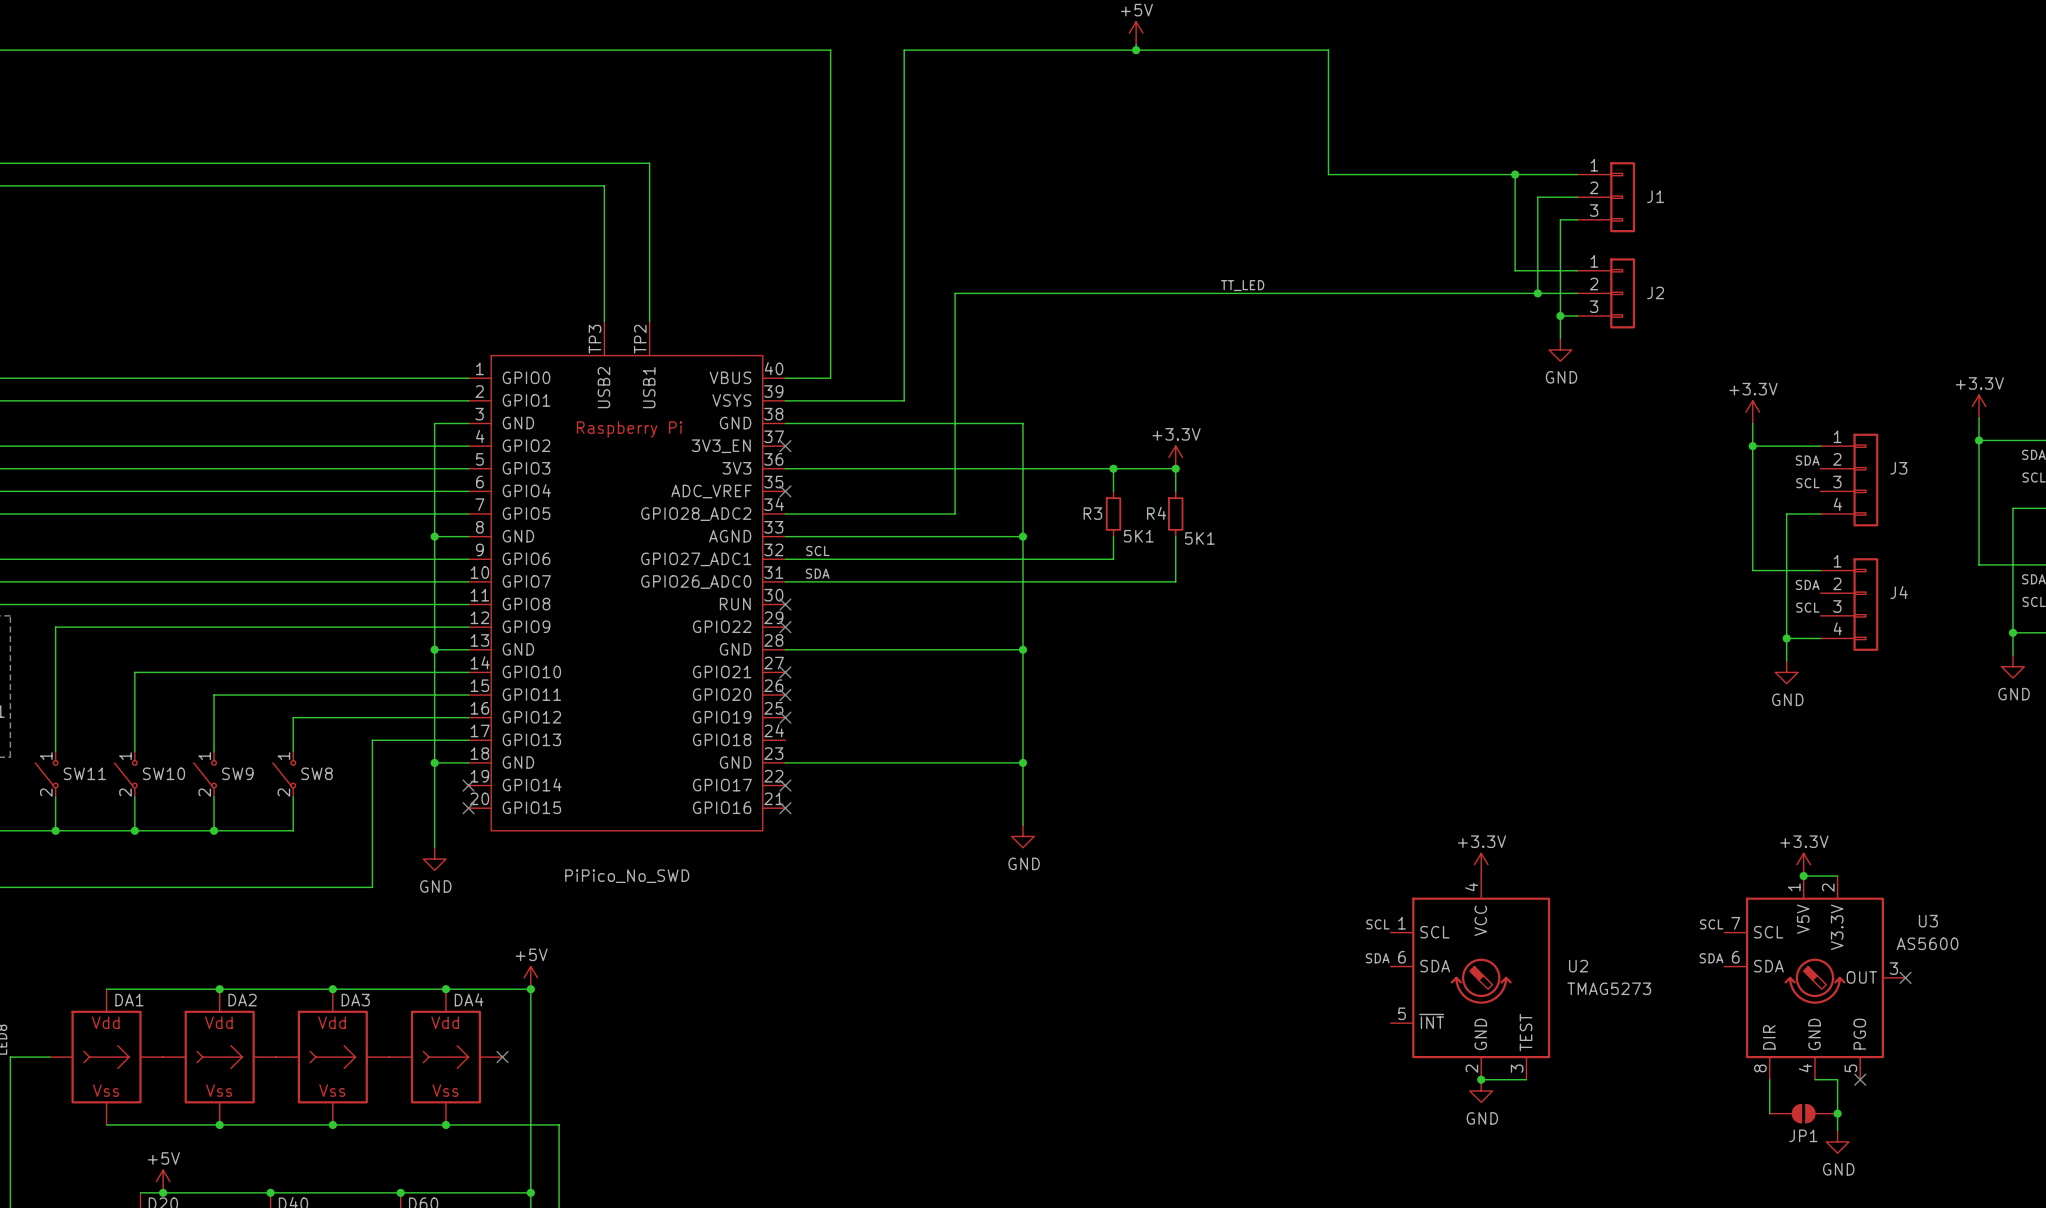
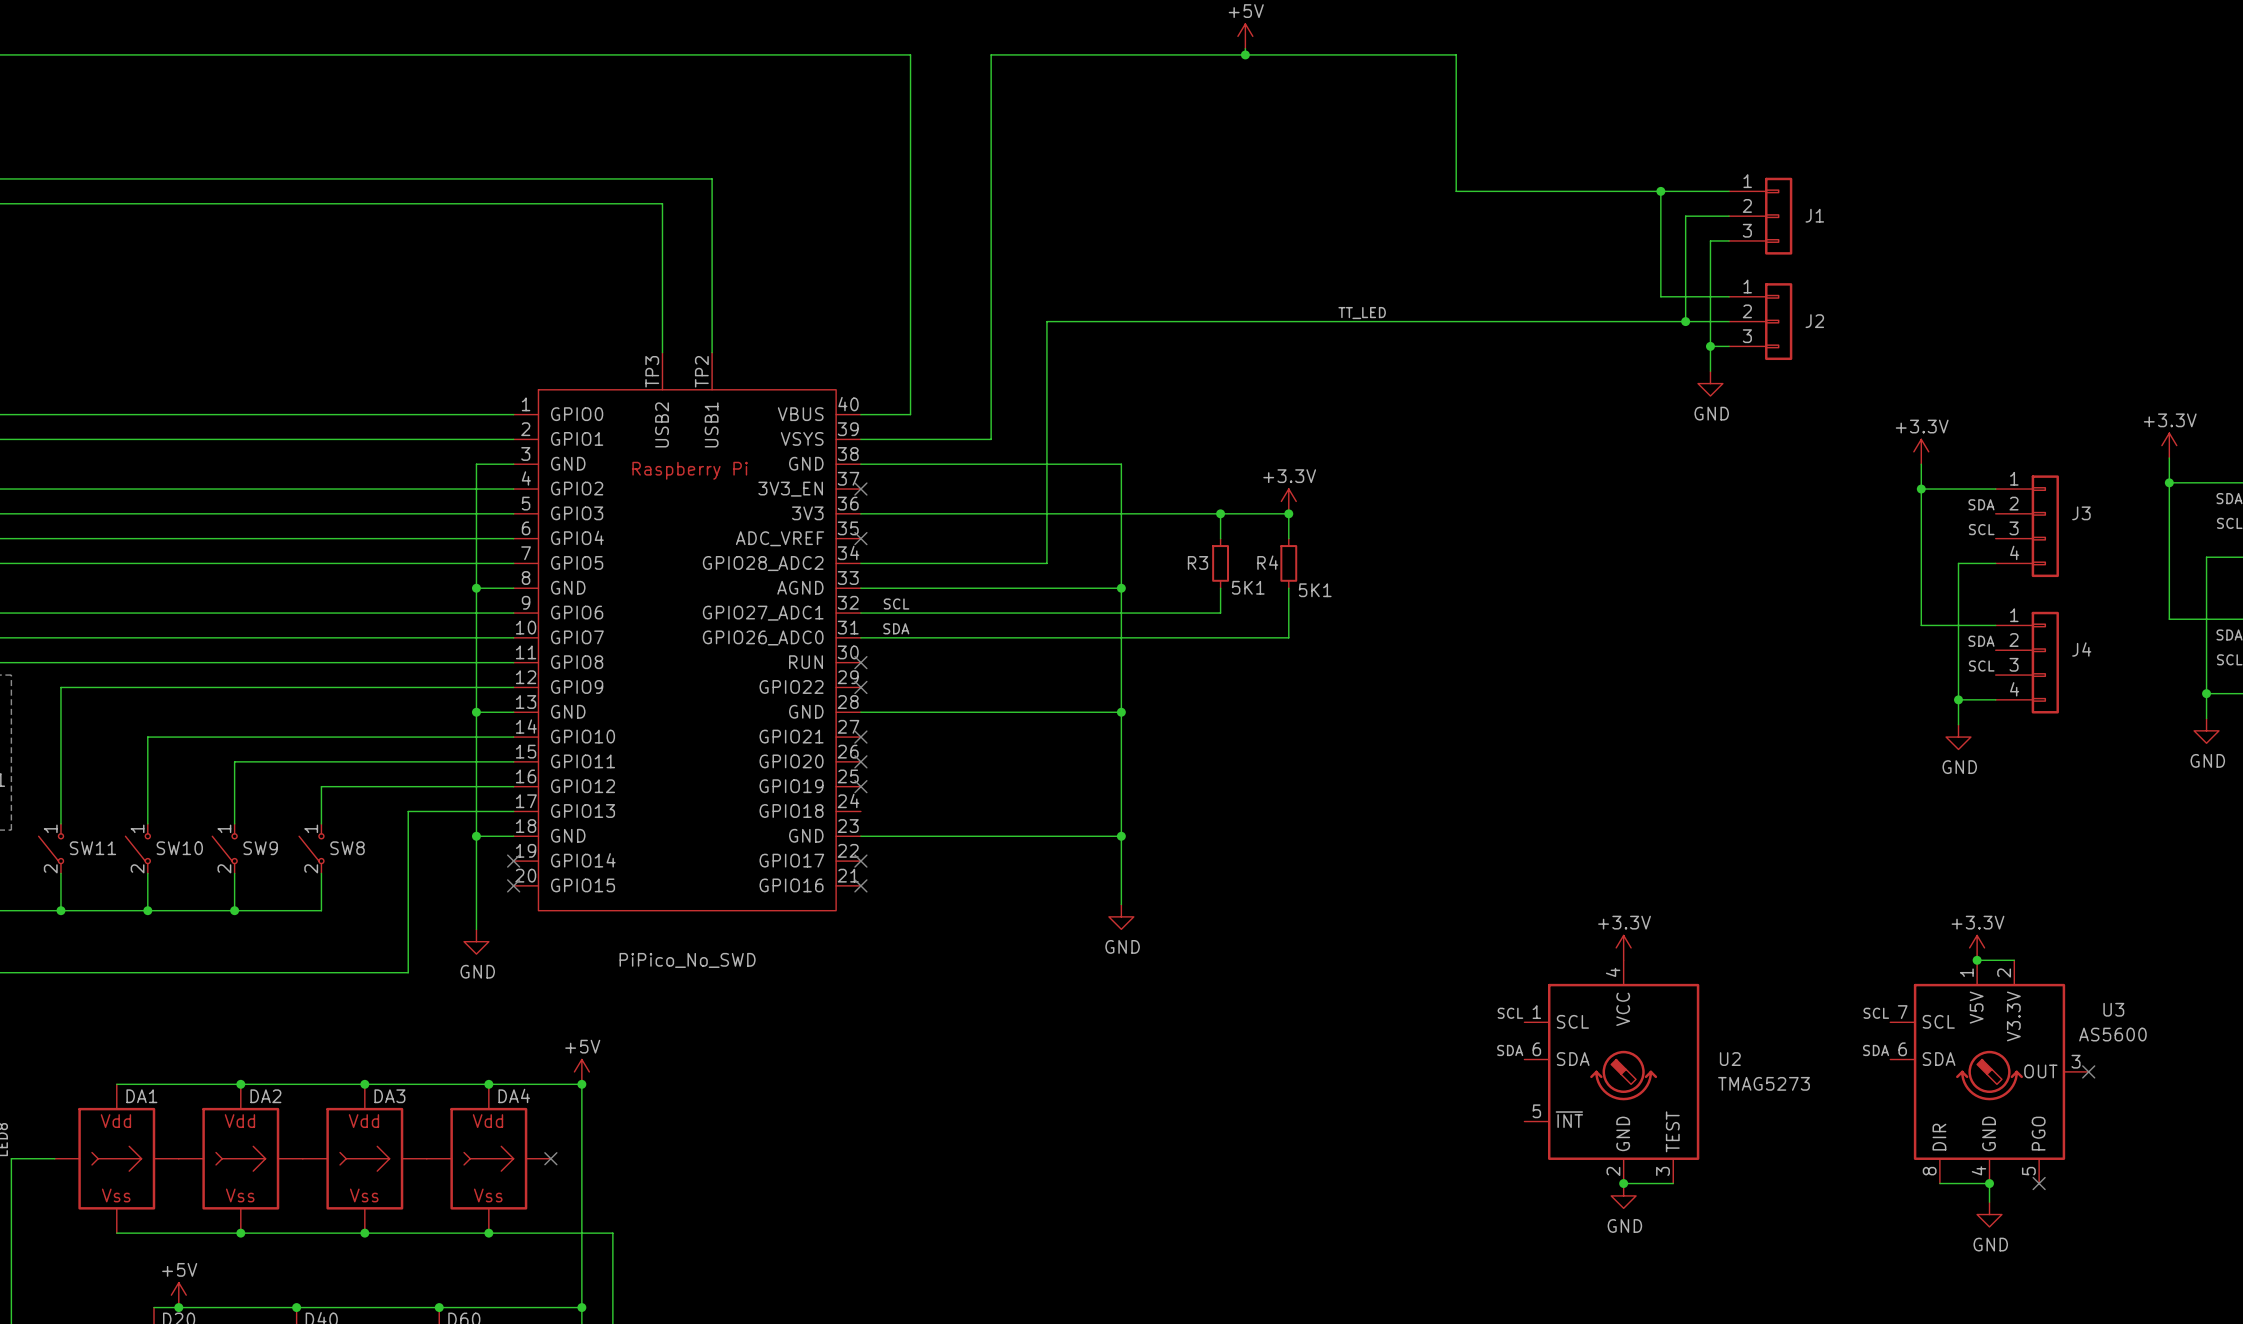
wire: (1769, 1079) (1769, 1113) -> (1939, 1183) (1989, 1183) (1989, 1202)
wire: (1814, 1079) (1837, 1079) (1837, 1130) -> none
JP1: (1803, 1113) -> none
junction position: (1837, 1113) -> (1989, 1183)
power symbol position: GND (1837, 1141) -> GND (1989, 1214)

